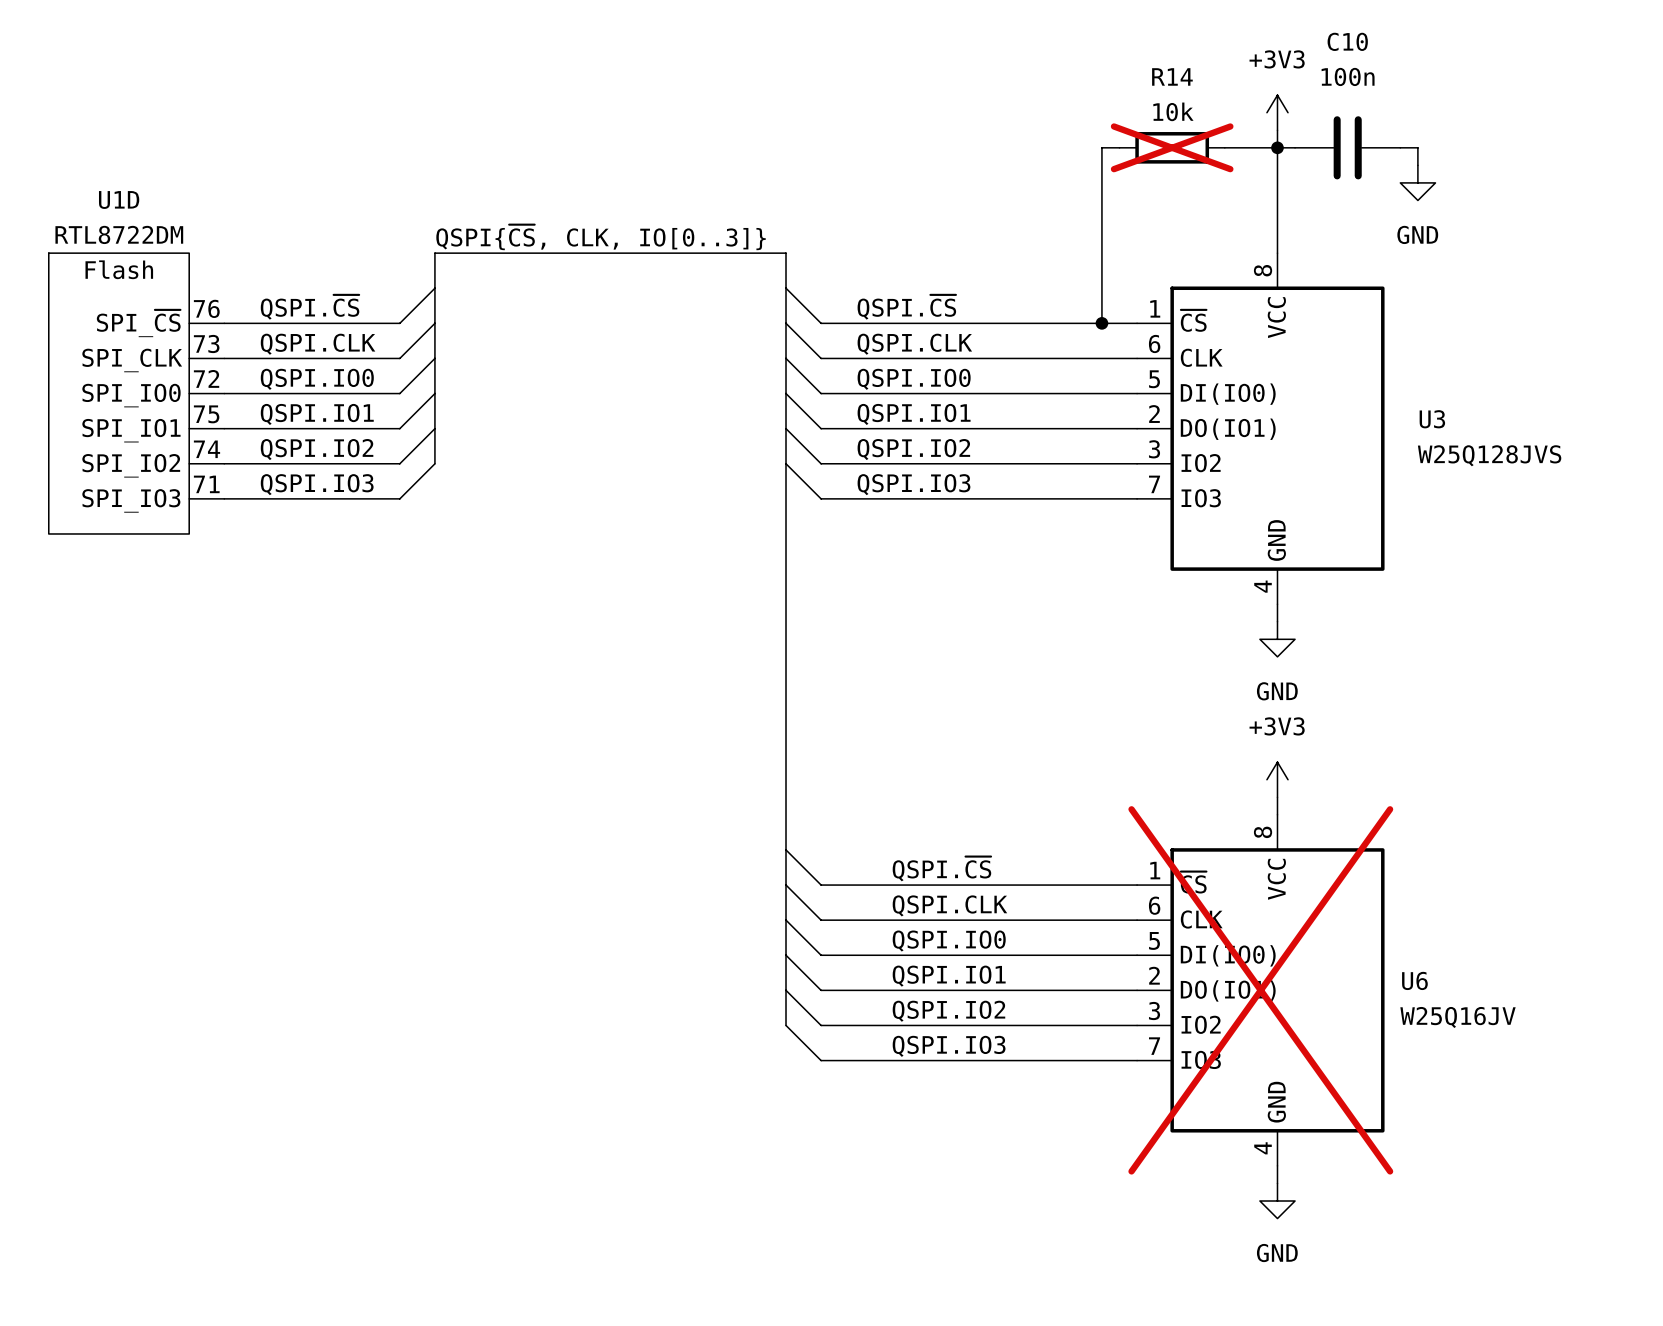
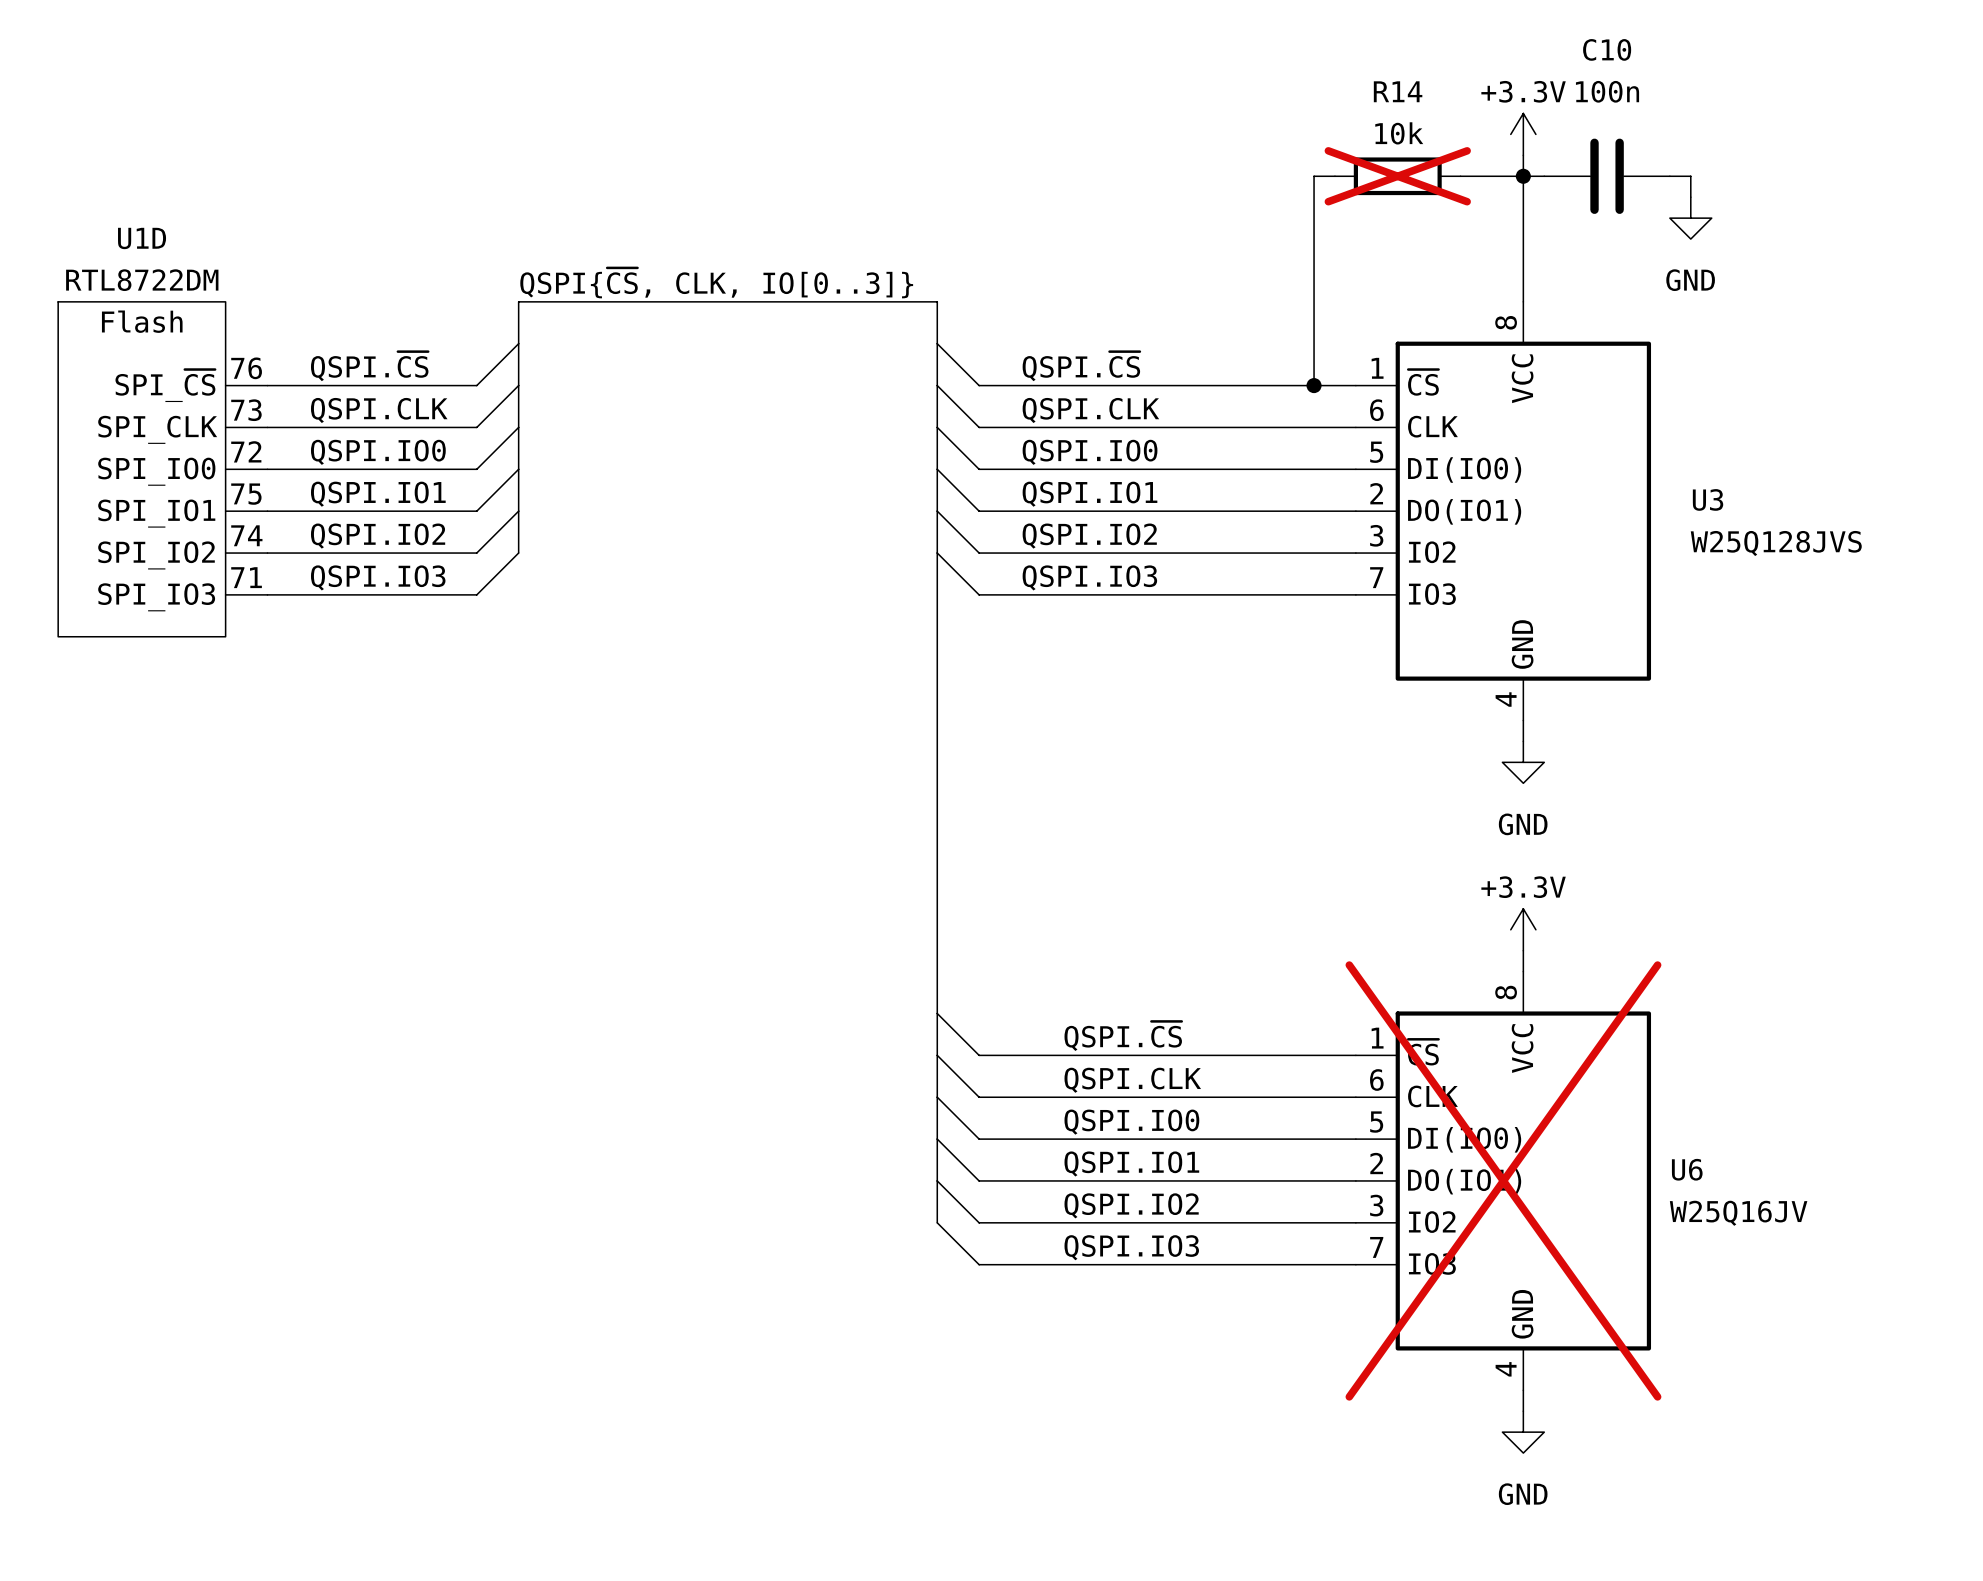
power symbol: +3V3 (1277, 112) -> +3.3V (1523, 134)
power symbol: +3V3 (1277, 779) -> +3.3V (1523, 929)

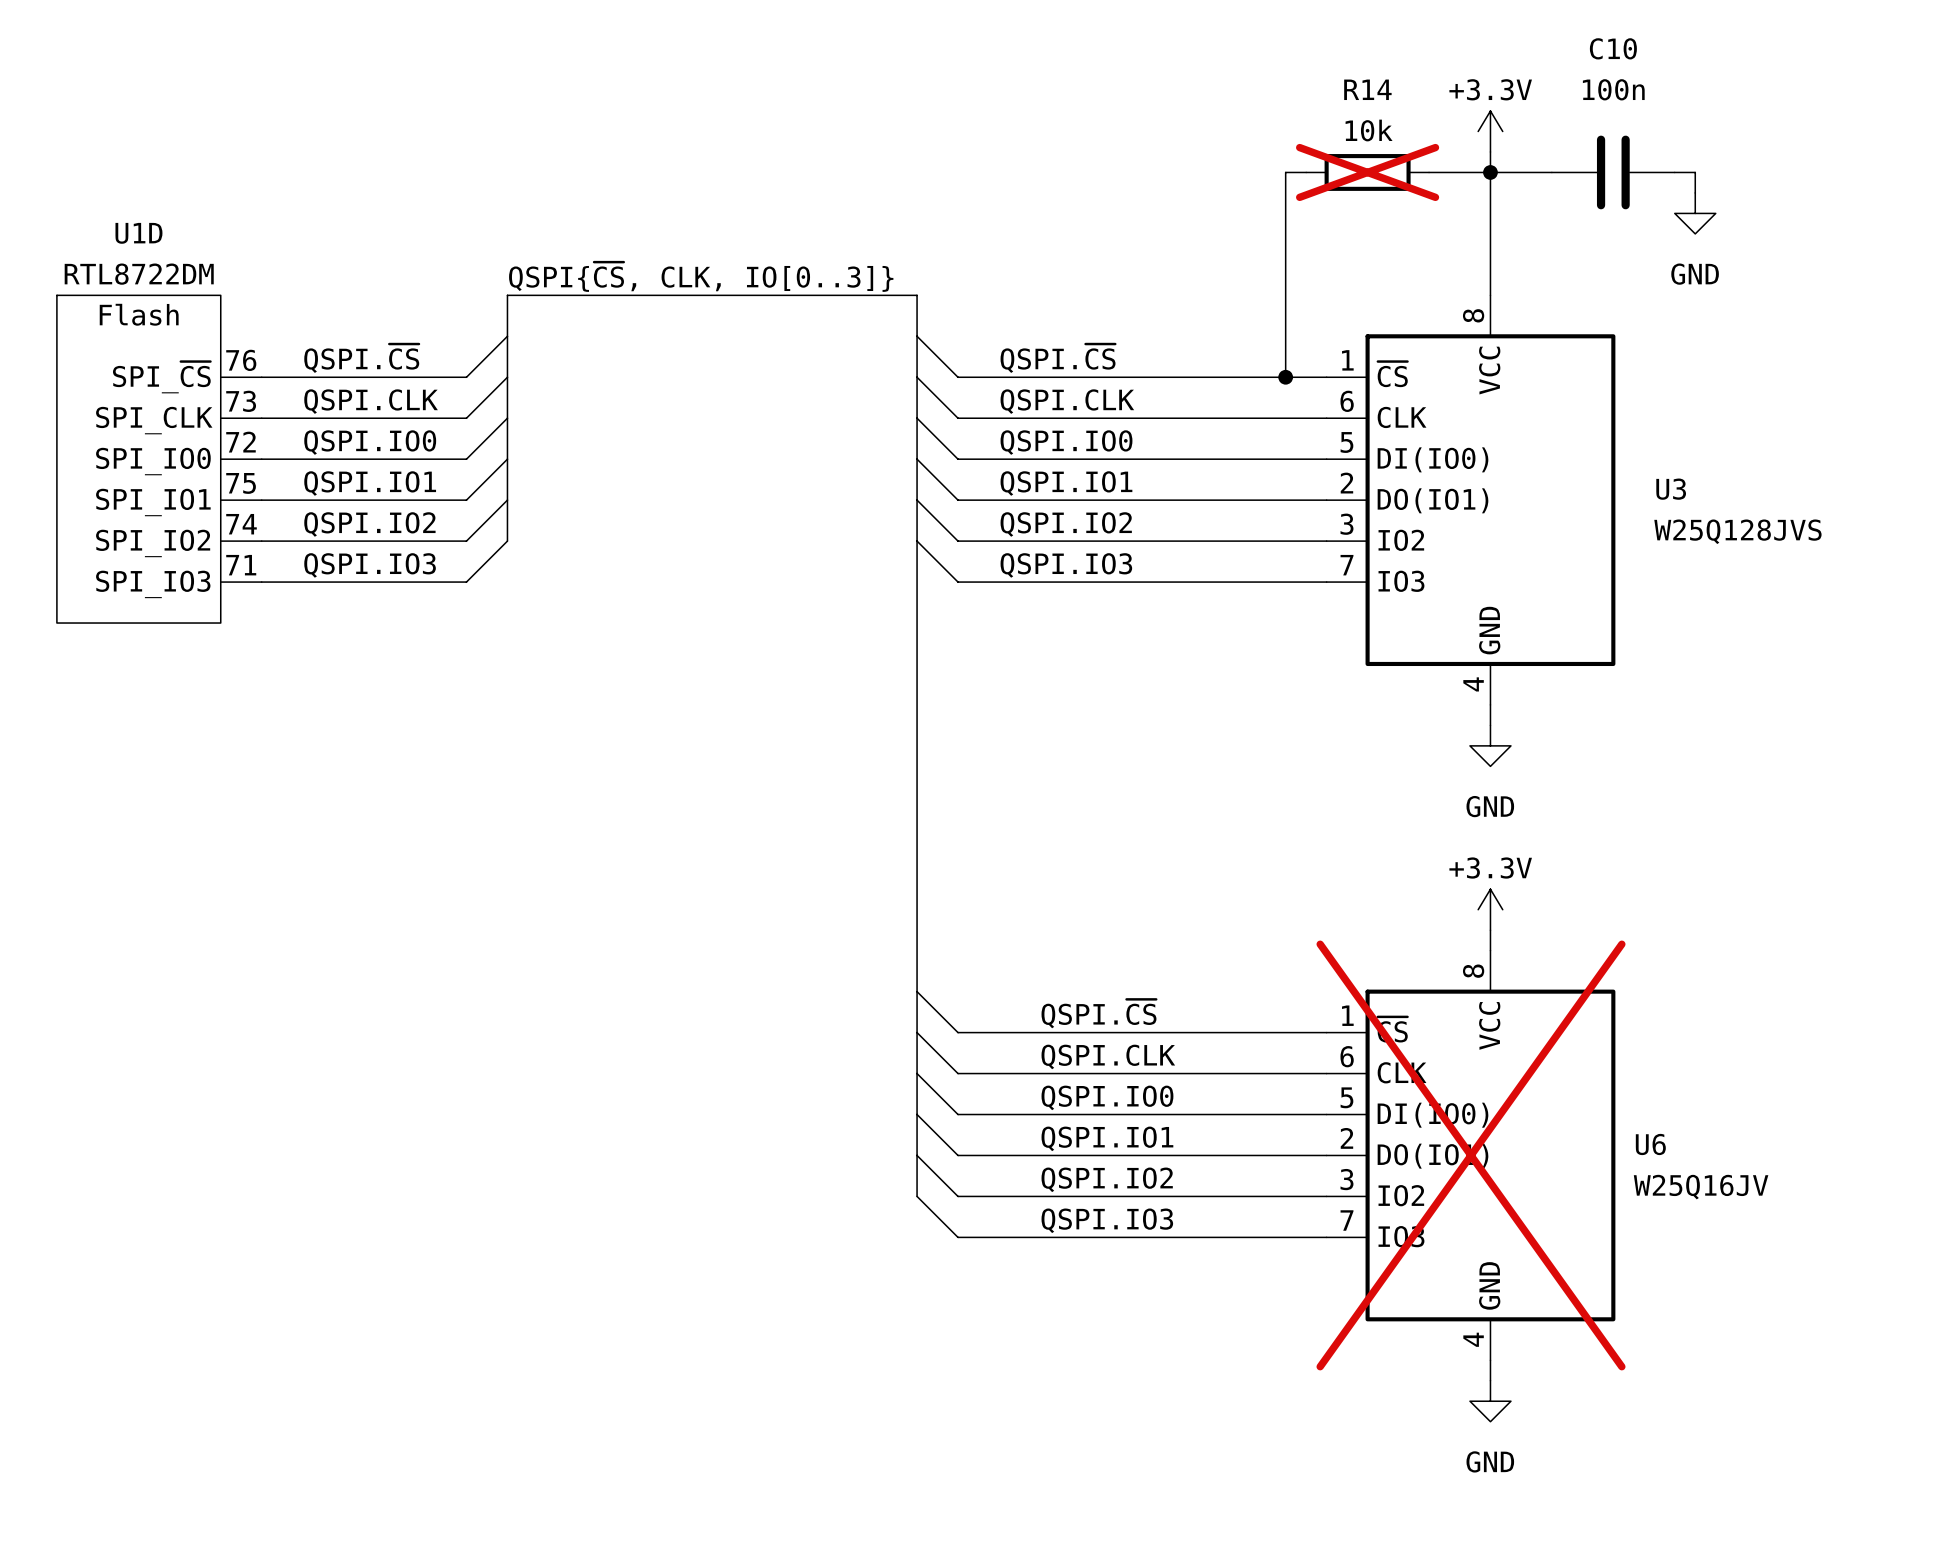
C10 position: (1607, 176) -> (1613, 172)
wire: (1669, 176) (1690, 176) (1690, 197) -> (1674, 172) (1695, 172) (1695, 192)
power symbol position: GND (1690, 218) -> GND (1695, 213)

